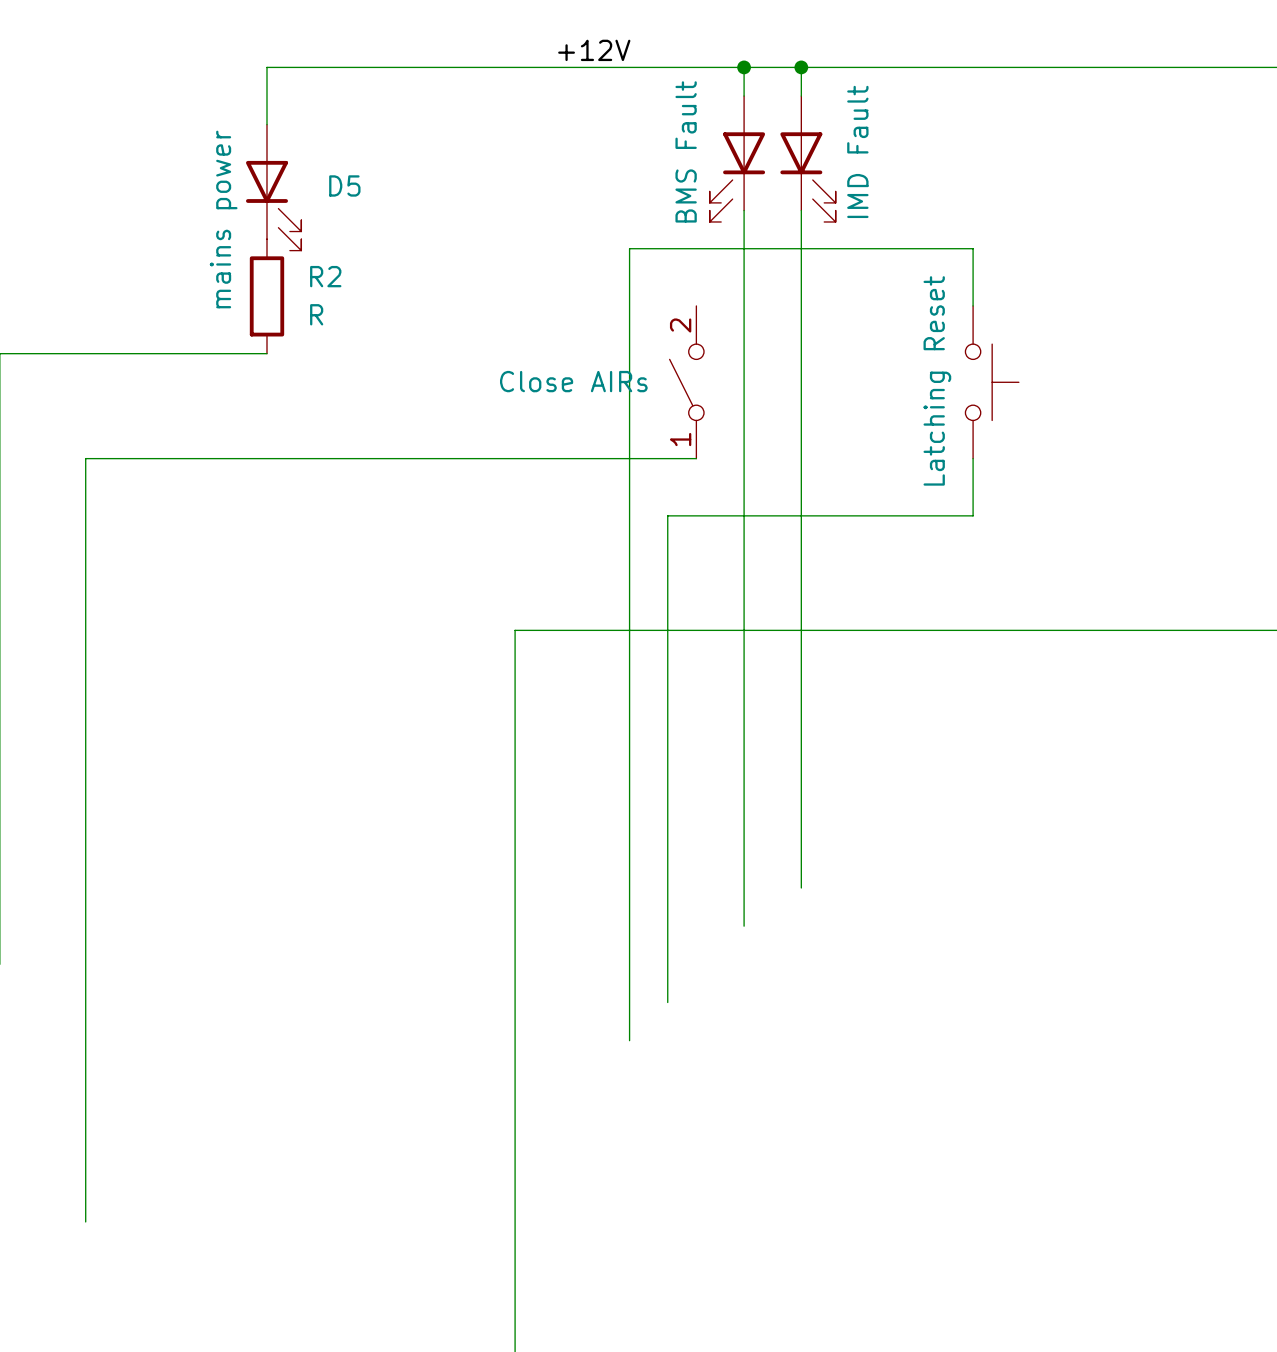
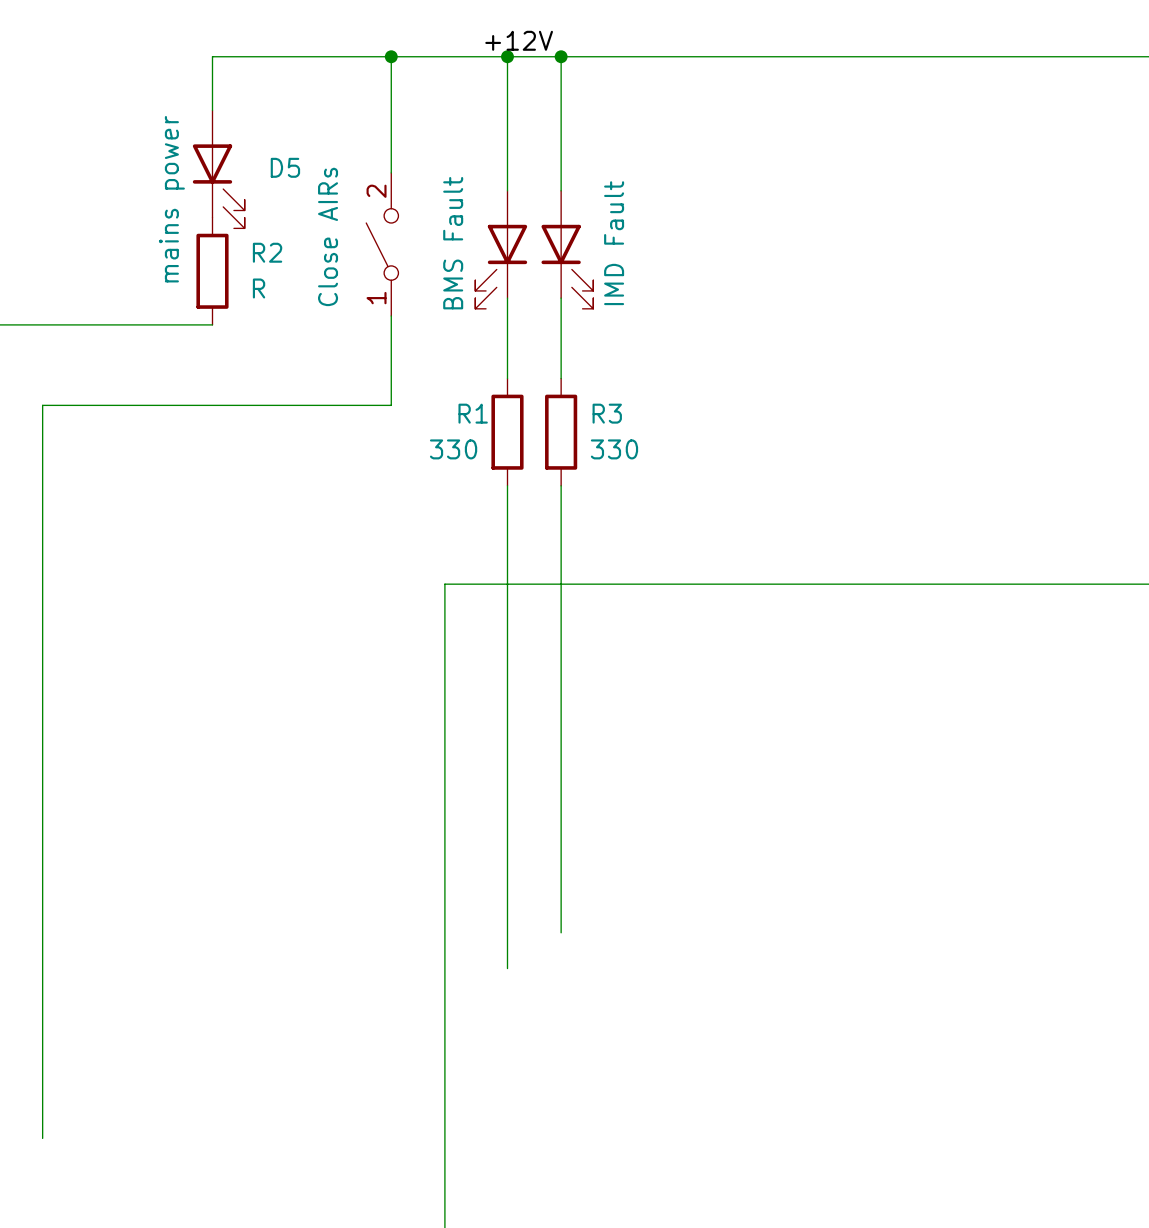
wire: none -> (391, 56) (391, 172)
junction: none -> (391, 56)
wire: none -> (507, 56) (507, 190)
junction: none -> (507, 56)
wire: none -> (561, 56) (561, 190)
junction: none -> (561, 56)
wire: (744, 67) (744, 96) -> none
junction: (744, 67) -> none
wire: (801, 67) (801, 96) -> none
junction: (801, 67) -> none
part position: (737, 159) -> (501, 249)
part position: (808, 159) -> (567, 249)
wire: (744, 210) (744, 926) -> none
wire: (801, 210) (801, 887) -> none
wire: (973, 305) (973, 248) (629, 248) (629, 1040) -> none
wire: none -> (507, 298) (507, 378)
wire: none -> (561, 298) (561, 378)
part value rotation: 0° (573, 381) -> 90° counterclockwise (328, 236)
part position: (686, 382) -> (382, 244)
part: Latching Reset (992, 382) -> none
wire: (85, 458) (696, 458) -> (42, 423) (42, 405) (391, 405) (391, 315)
wire: (973, 458) (973, 515) (667, 515) (667, 1002) -> none
R1: none -> 330 (507, 432)
R3: none -> 330 (561, 432)
wire: none -> (507, 485) (507, 968)
wire: none -> (561, 485) (561, 932)

